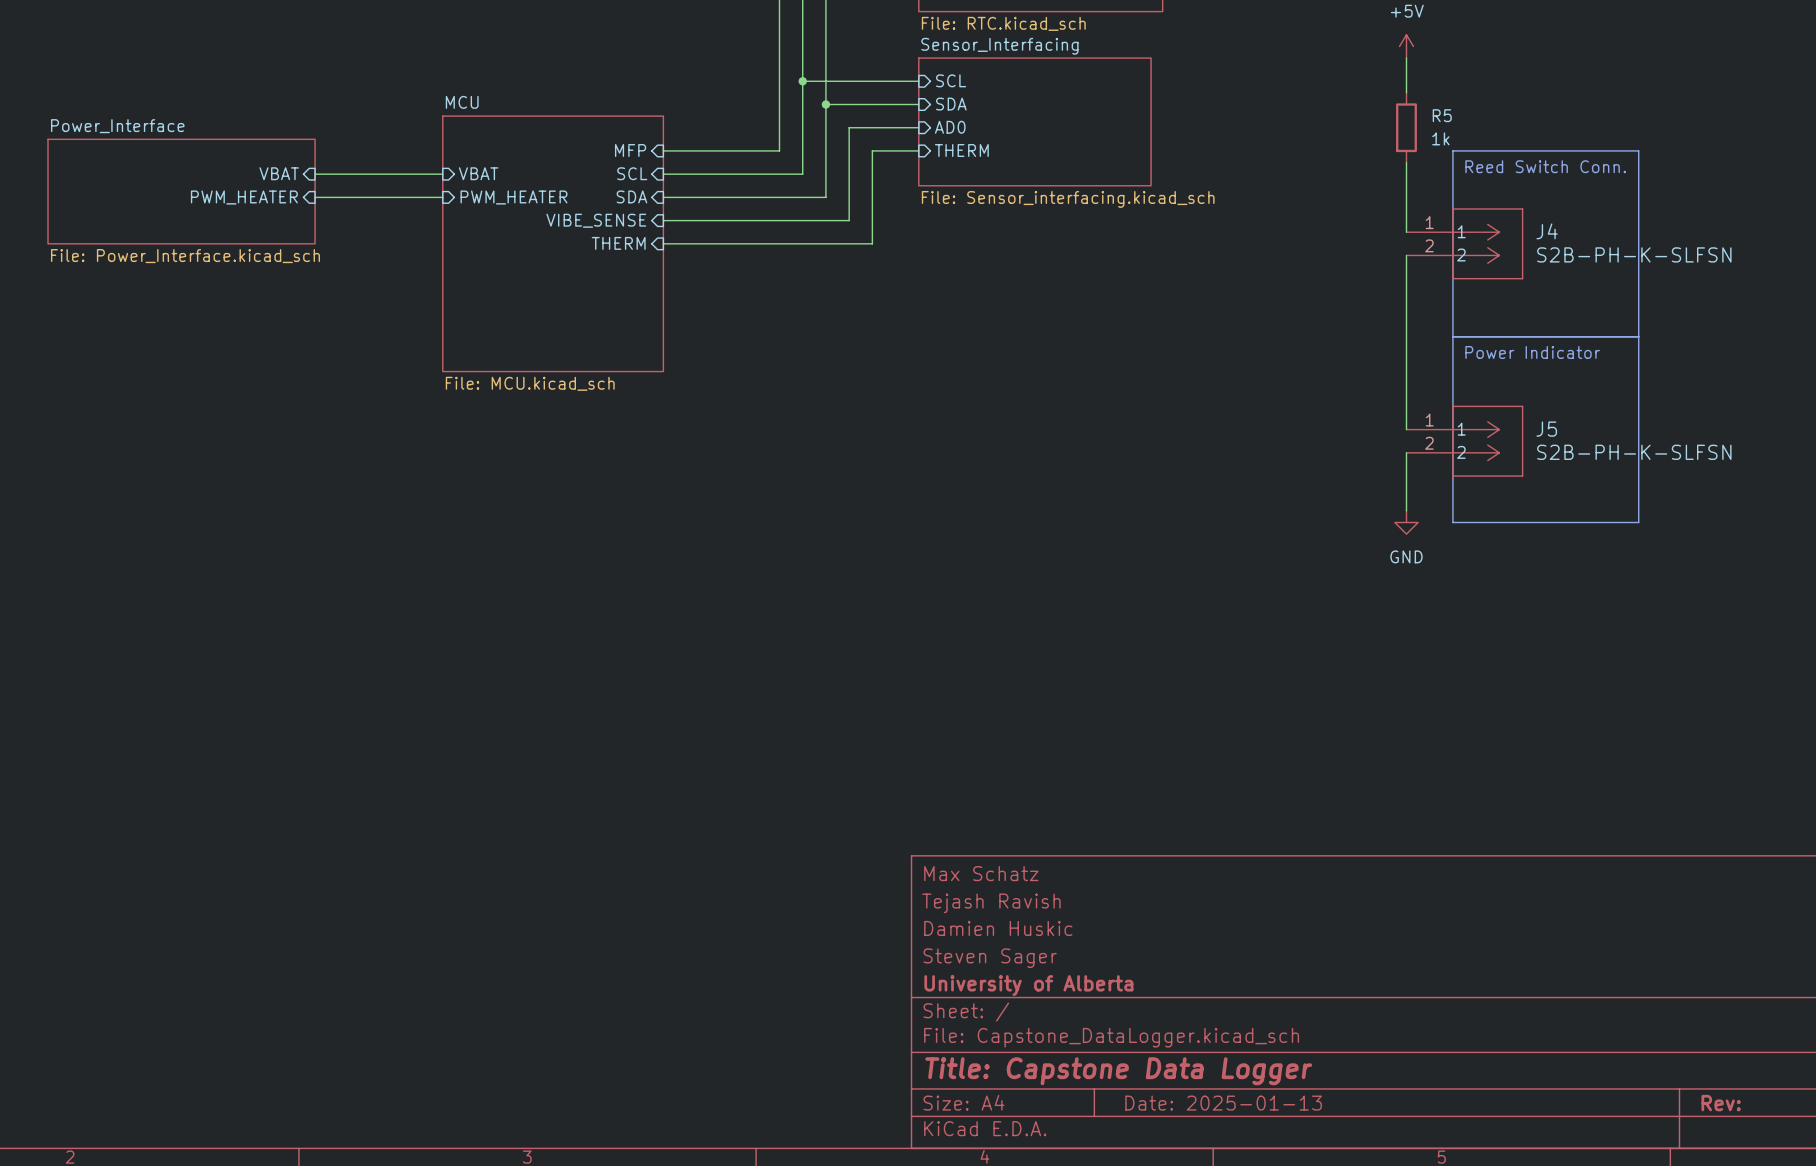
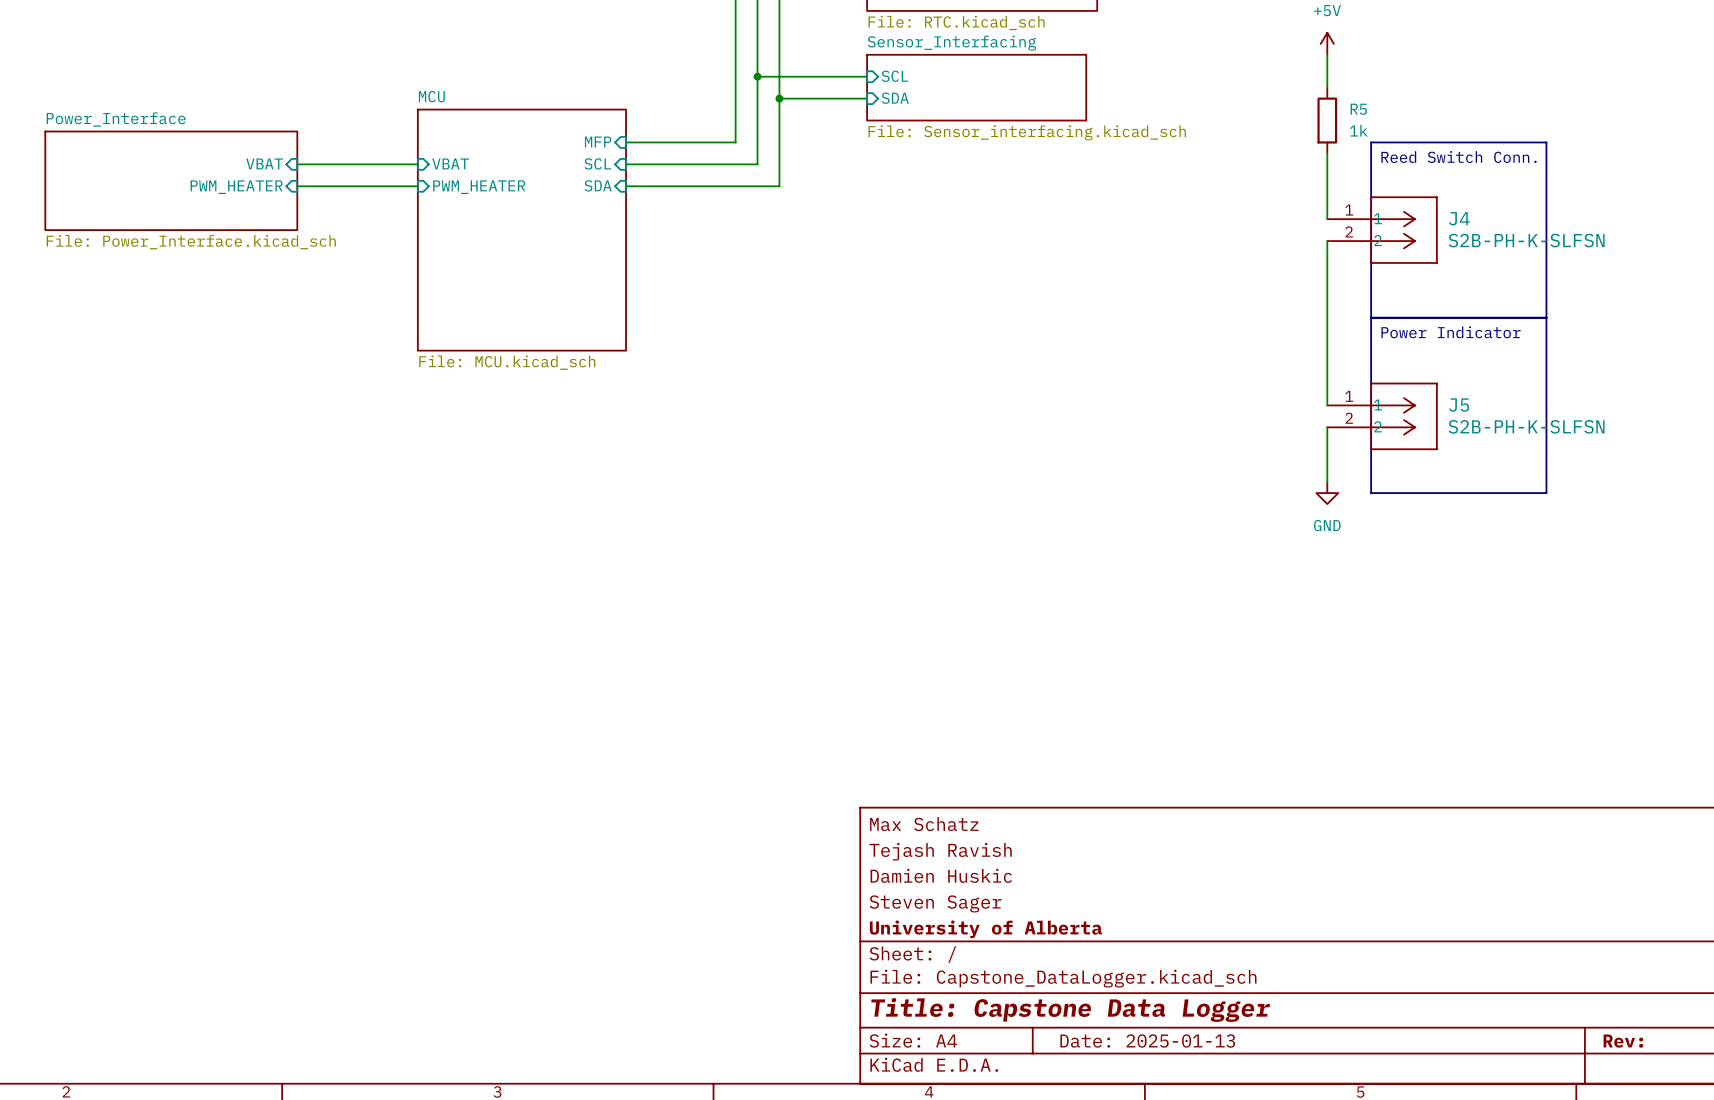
sheet Sensor_Interfacing: none -> File: Sensor_interfacing.kicad_sch (976, 87)
sheet Sensor_Interfacing: File: Sensor_interfacing.kicad_sch (1034, 121) -> none
wire: (918, 127) (849, 127) (849, 220) (663, 220) -> none
sheet pin: AD0 (950, 127) -> none
wire: (918, 150) (872, 150) (872, 243) (663, 243) -> none
sheet pin: THERM (961, 150) -> none
sheet pin: VIBE_SENSE (596, 220) -> none
sheet pin: THERM (618, 243) -> none

